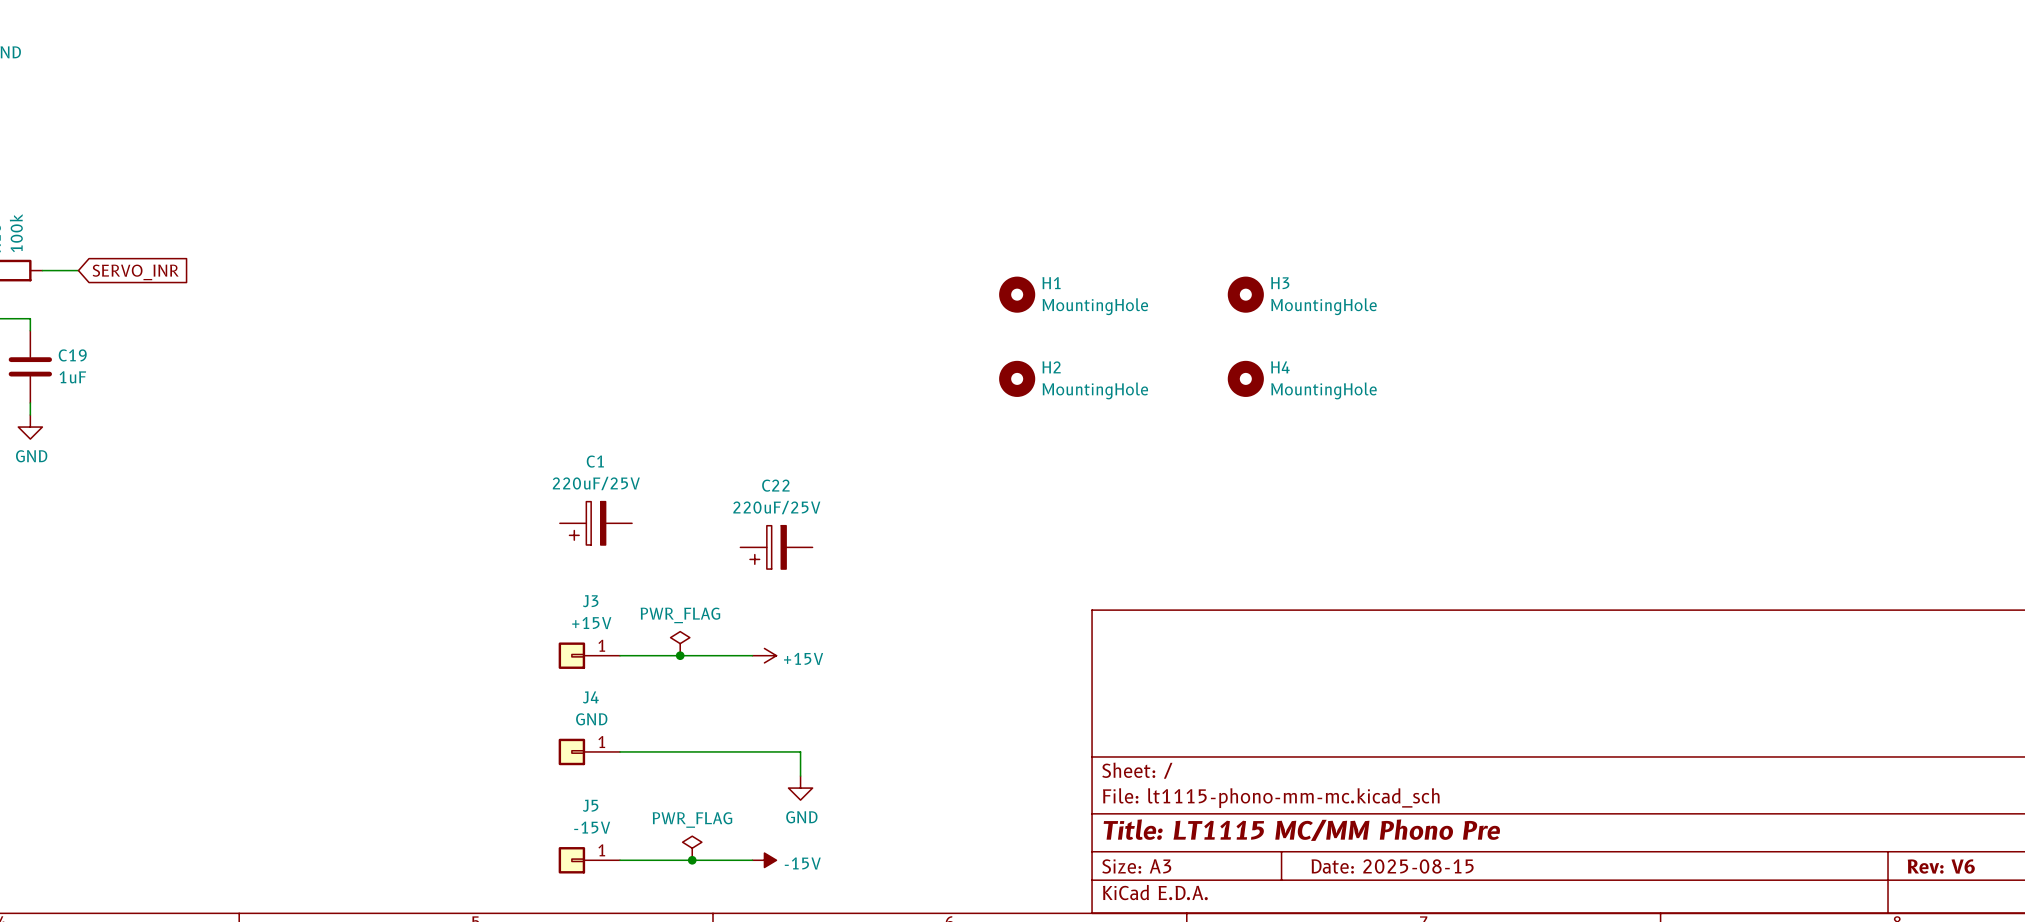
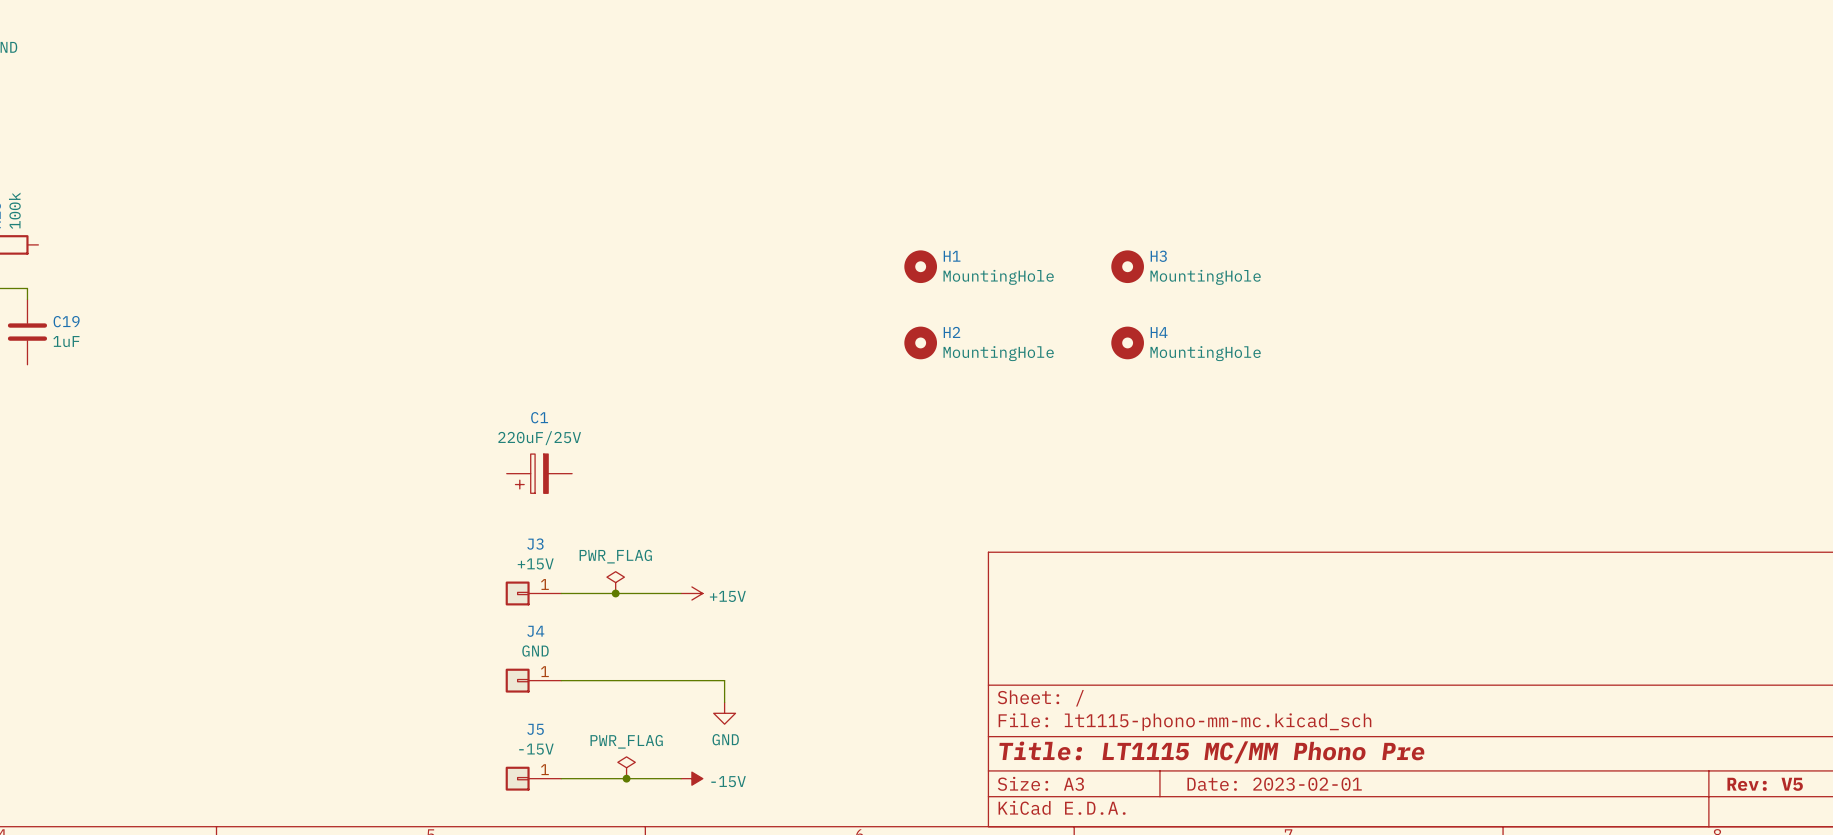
wire: (42, 270) (78, 270) -> none
global label: SERVO_INR (135, 272) -> none
wire: (30, 402) (30, 415) -> none
power symbol: GND (30, 427) -> none
C22: 220uF/25V (776, 547) -> none
title block: Date: 2025-08-15 (1392, 866) -> Date: 2023-02-01 (1274, 784)
title block: Rev: V6 (1941, 866) -> Rev: V5 (1765, 784)

